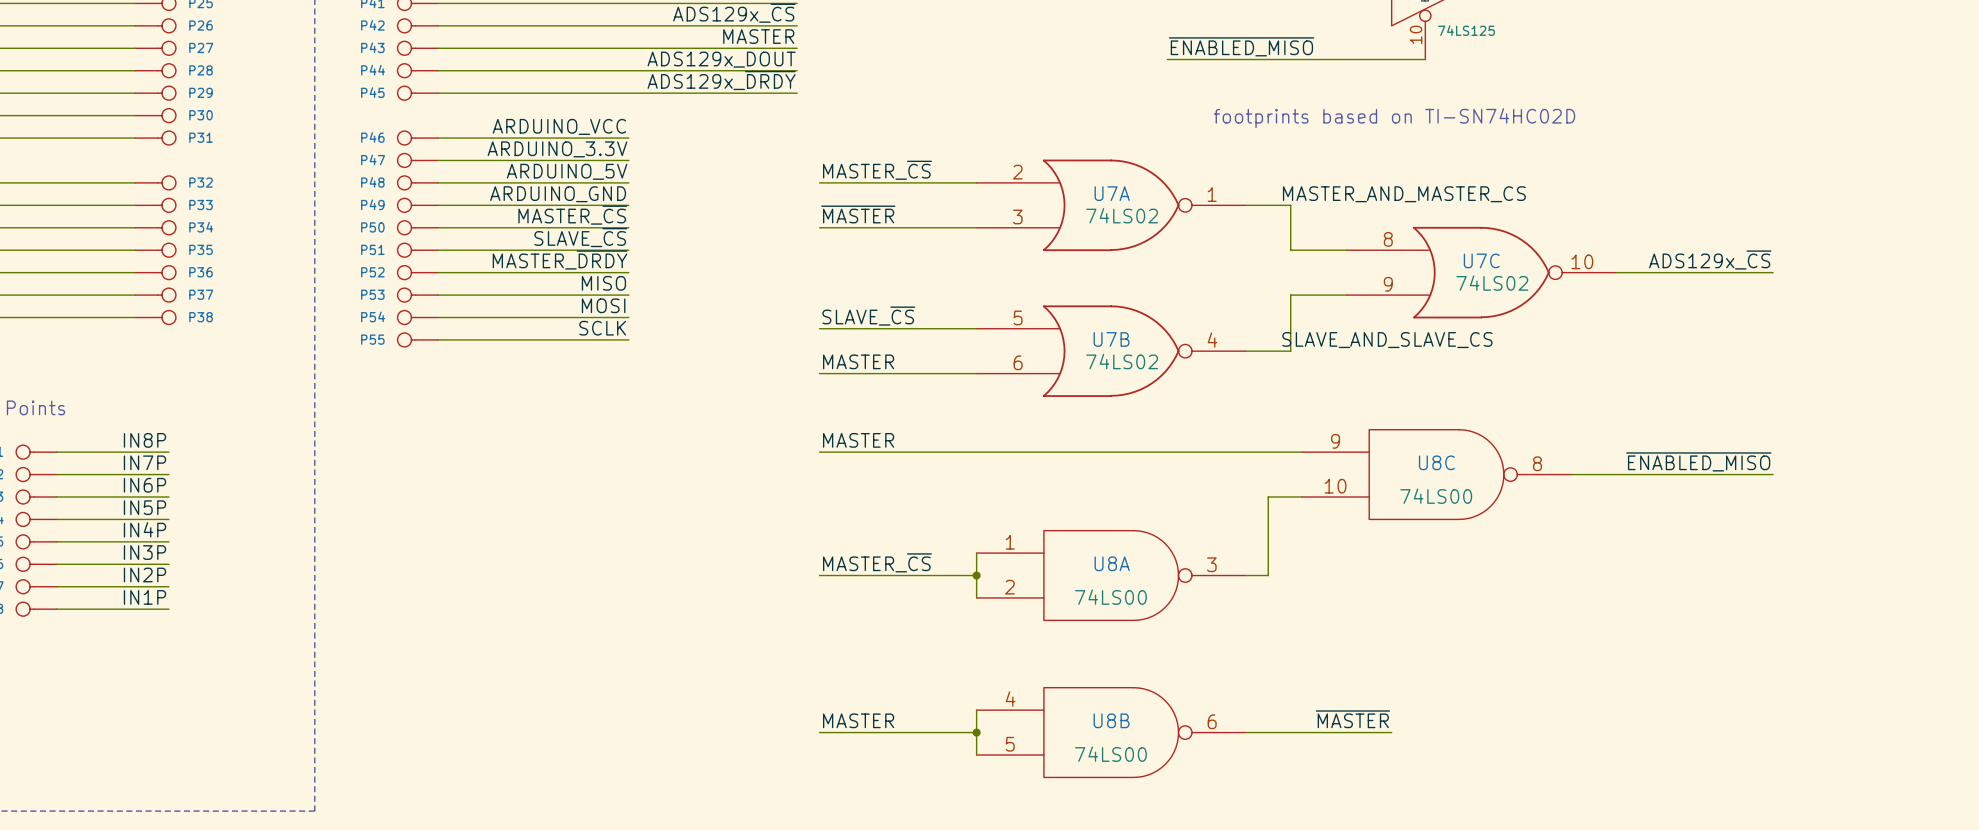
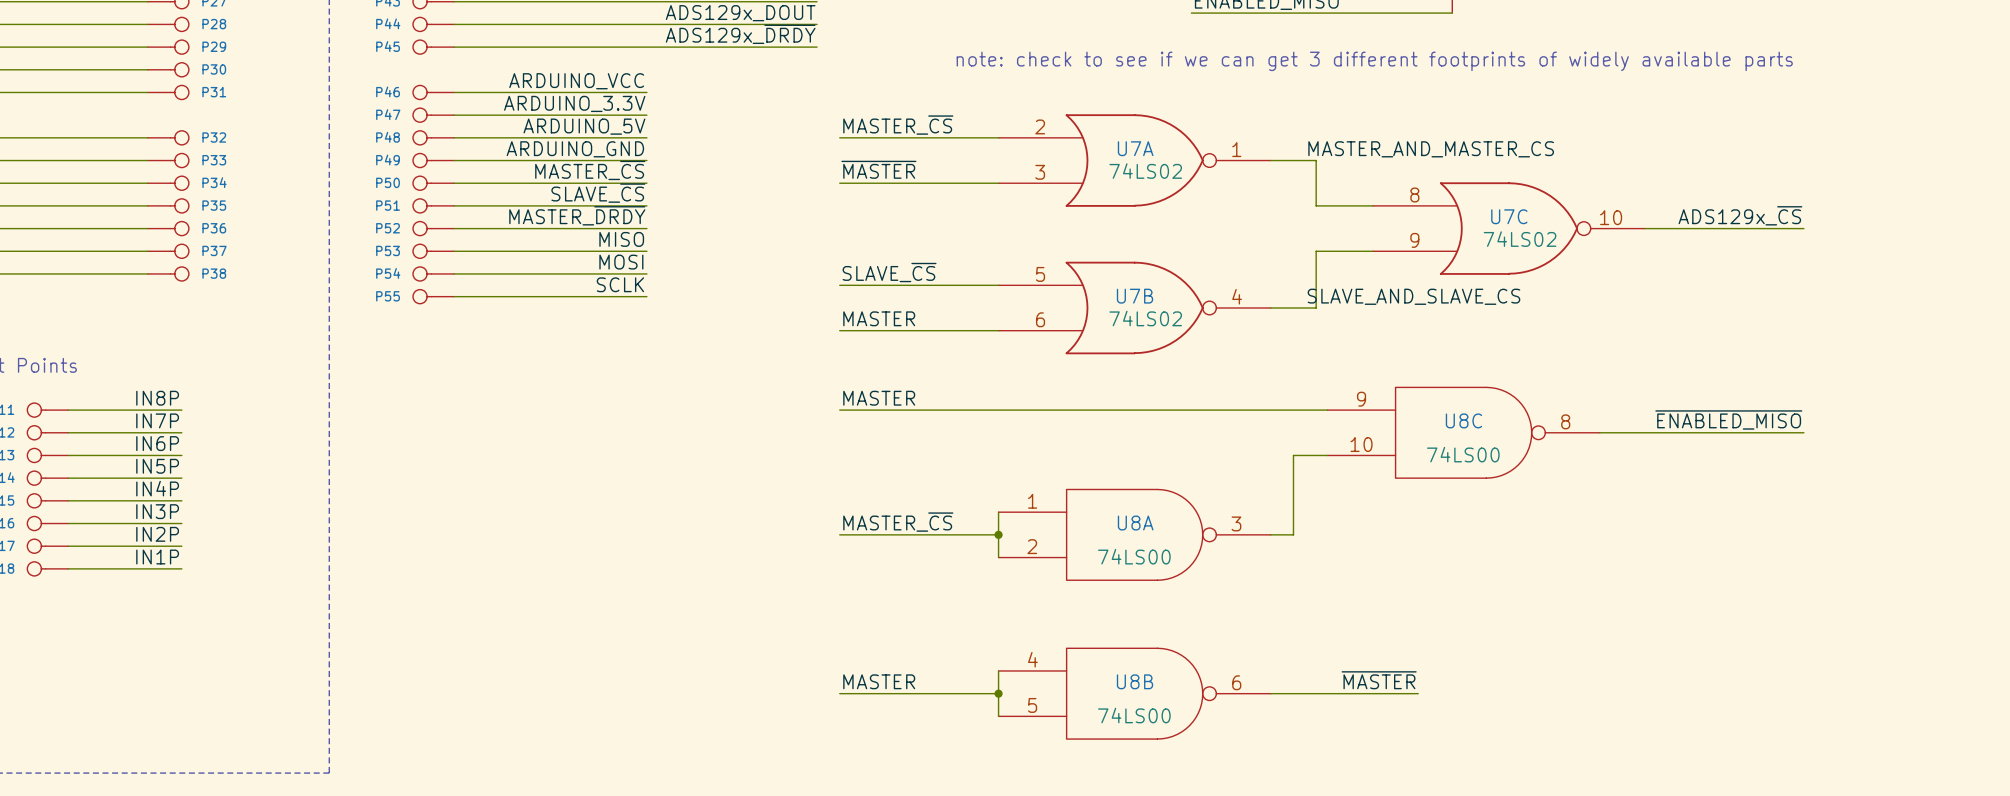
text: none -> note: check to see if we can get 3 different footprints of widely available parts (1374, 61)
text: footprints based on TI-SN74HC02D (1394, 118) -> none

